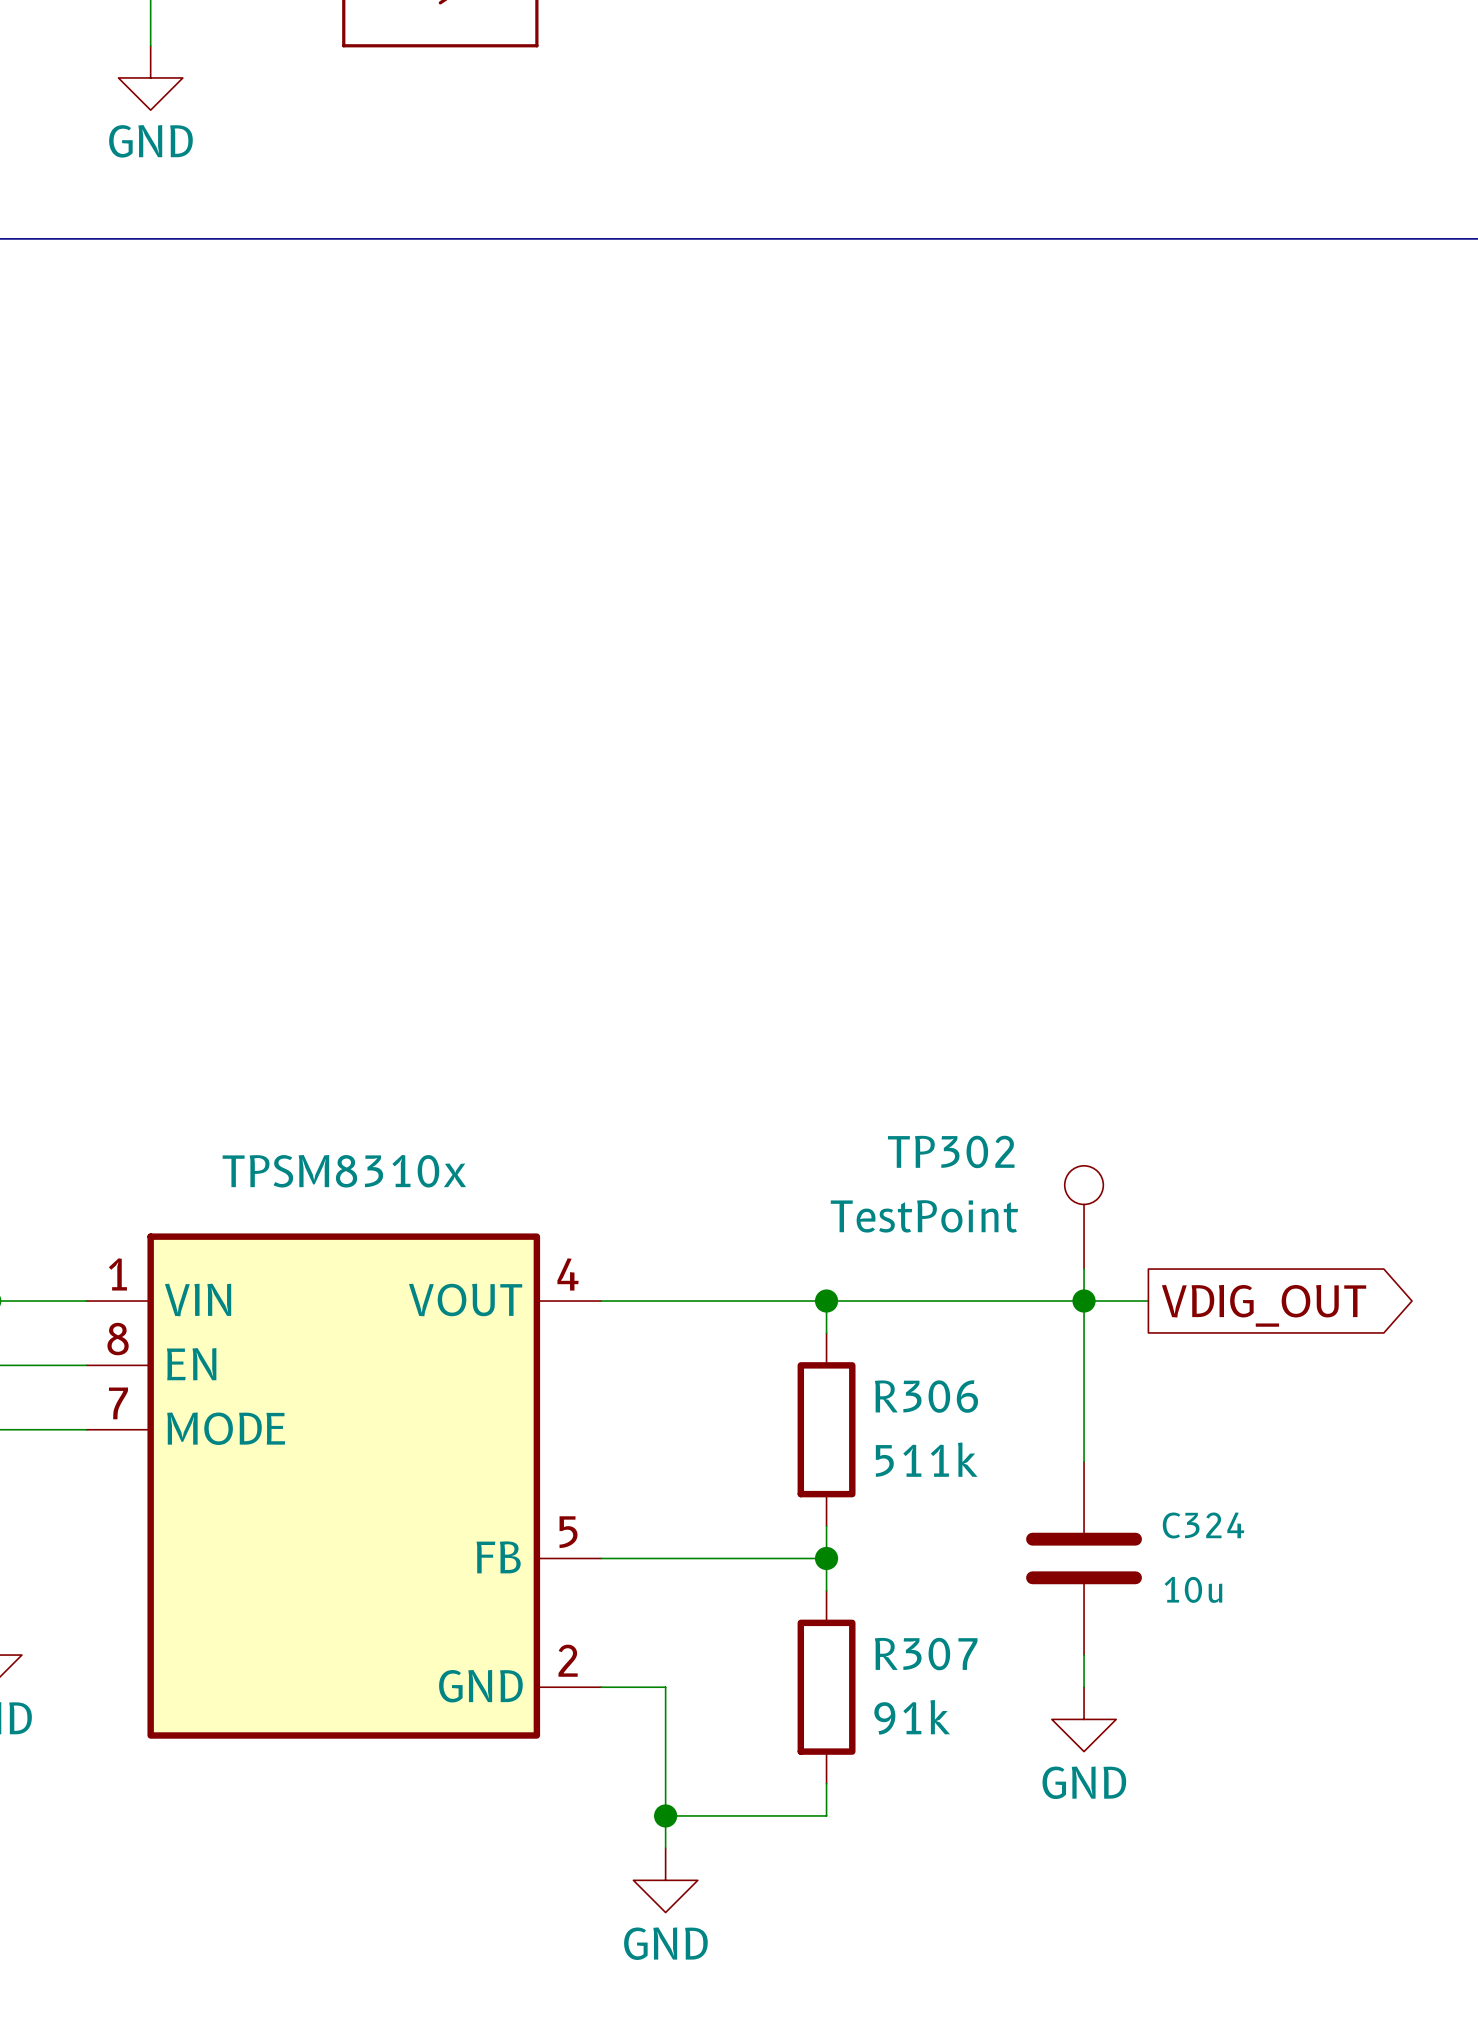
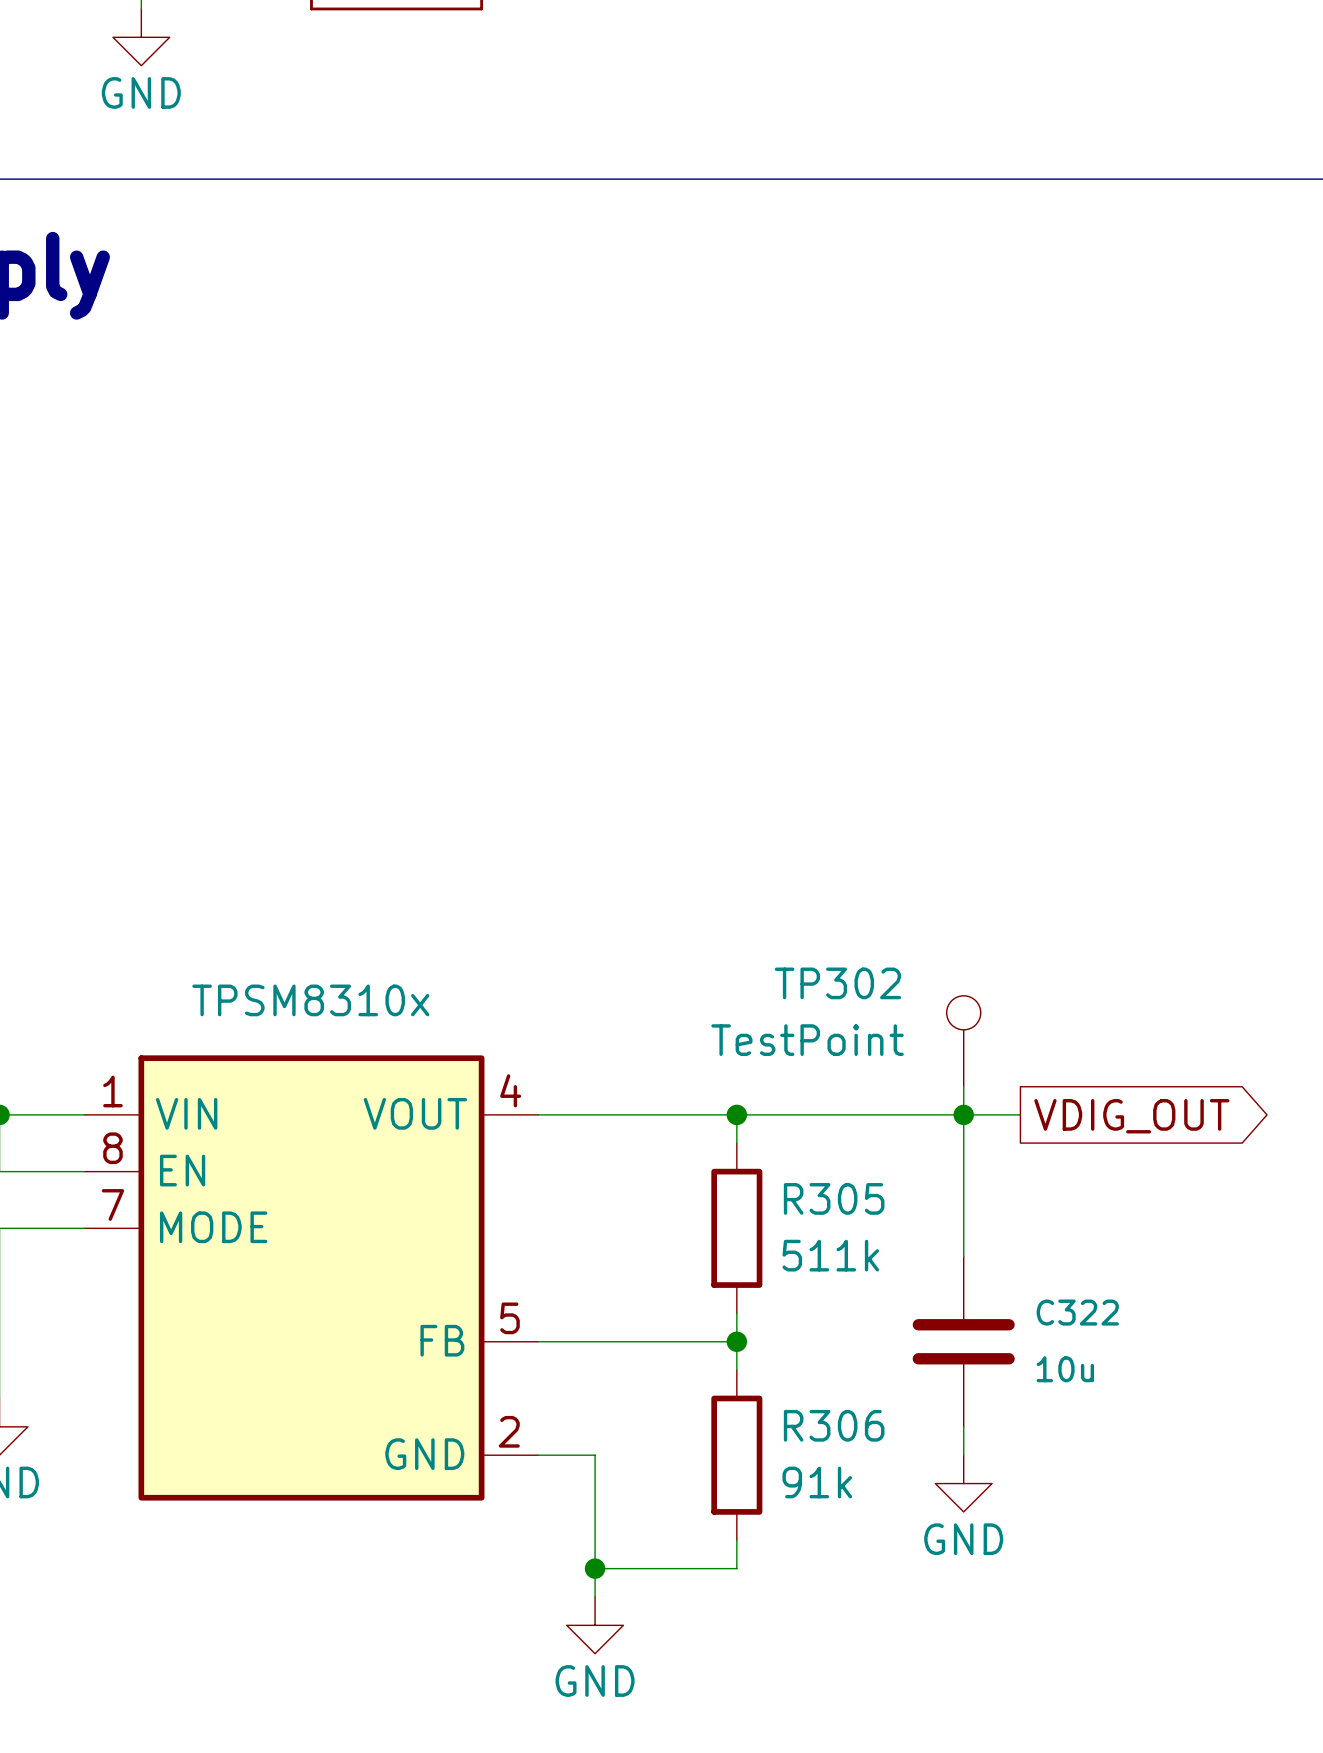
R306 name: R306 (926, 1396) -> R305 (834, 1198)
C324 name: C324 (1203, 1525) -> C322 (1077, 1312)
R307 name: R307 (926, 1654) -> R306 (834, 1425)

